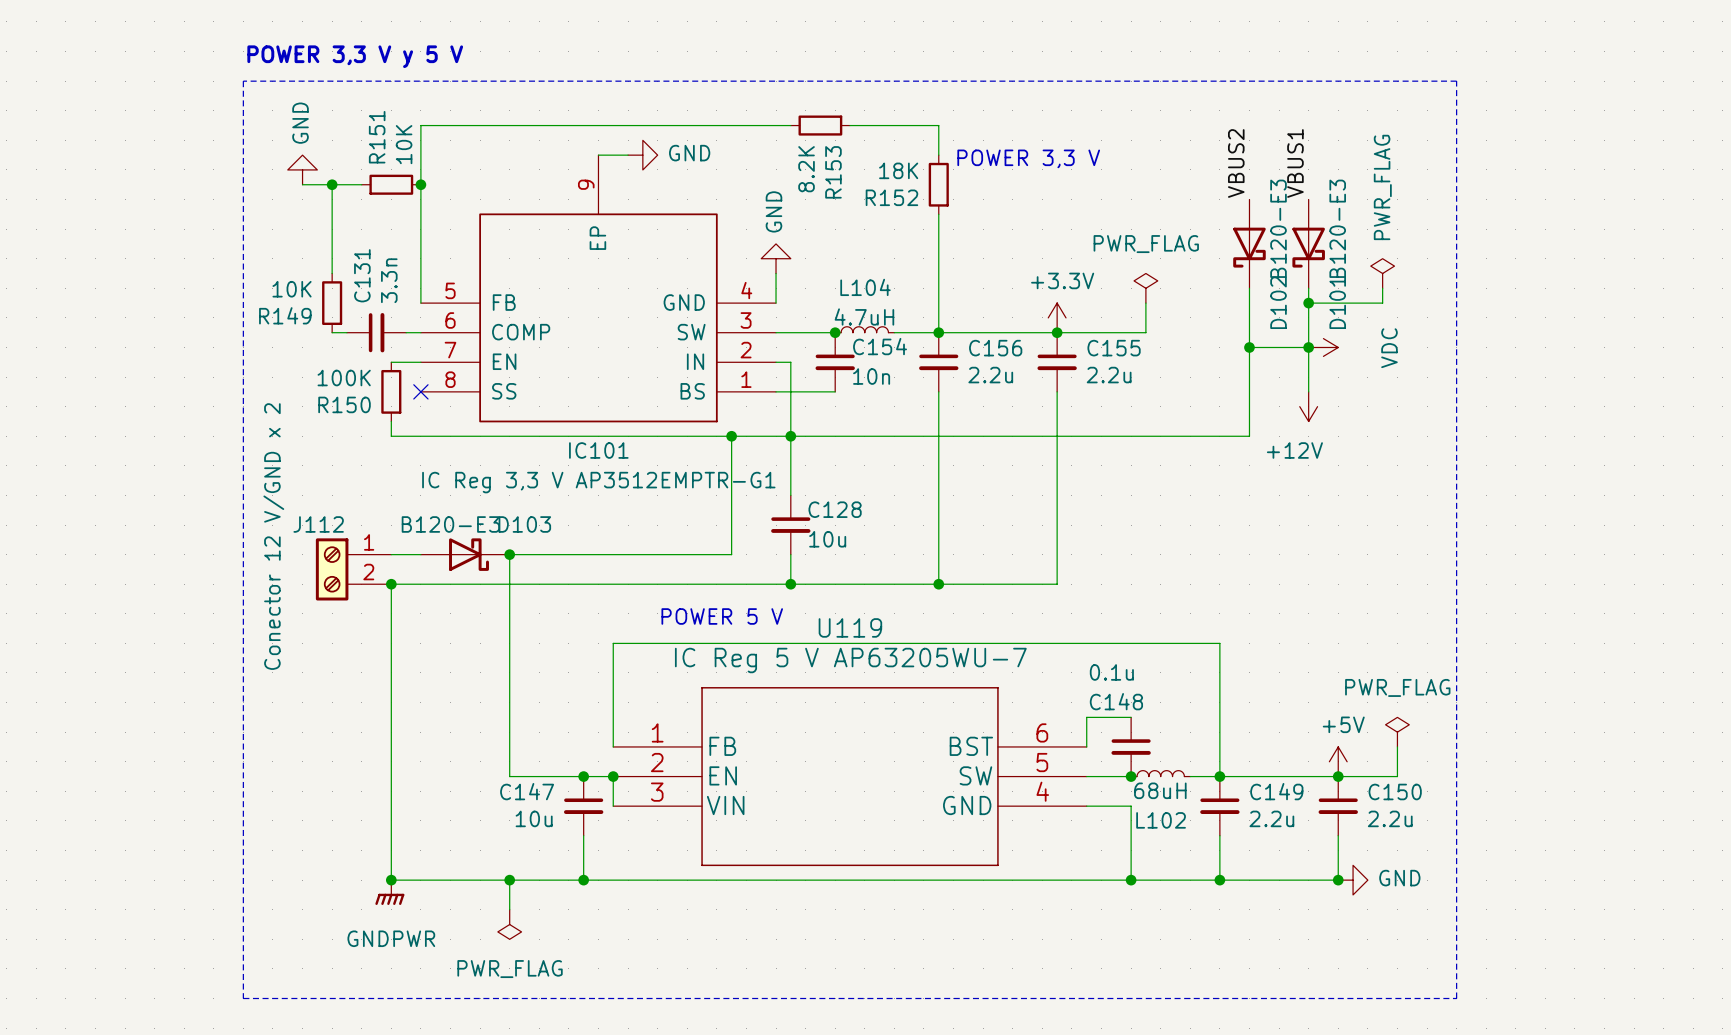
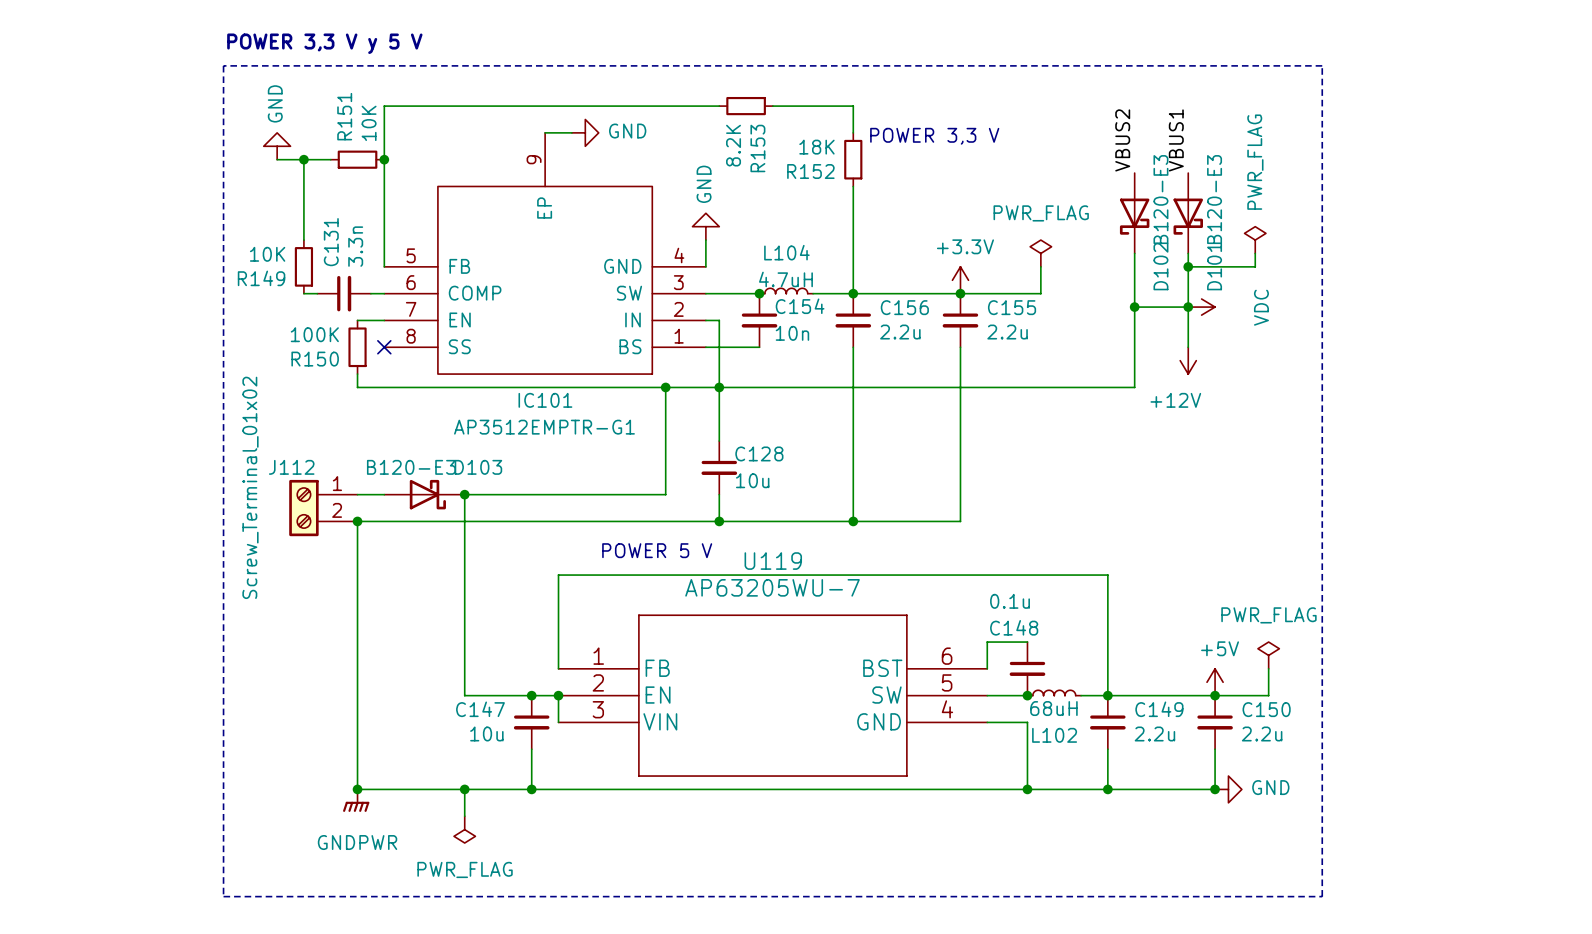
IC101 value: IC Reg 3,3 V AP3512EMPTR-G1 (598, 482) -> AP3512EMPTR-G1 (544, 427)
J112 value: Conector 12 V/GND x 2 (273, 536) -> Screw_Terminal_01x02 (250, 487)
U119 value: IC Reg 5 V AP63205WU-7 (850, 660) -> AP63205WU-7 (772, 587)

